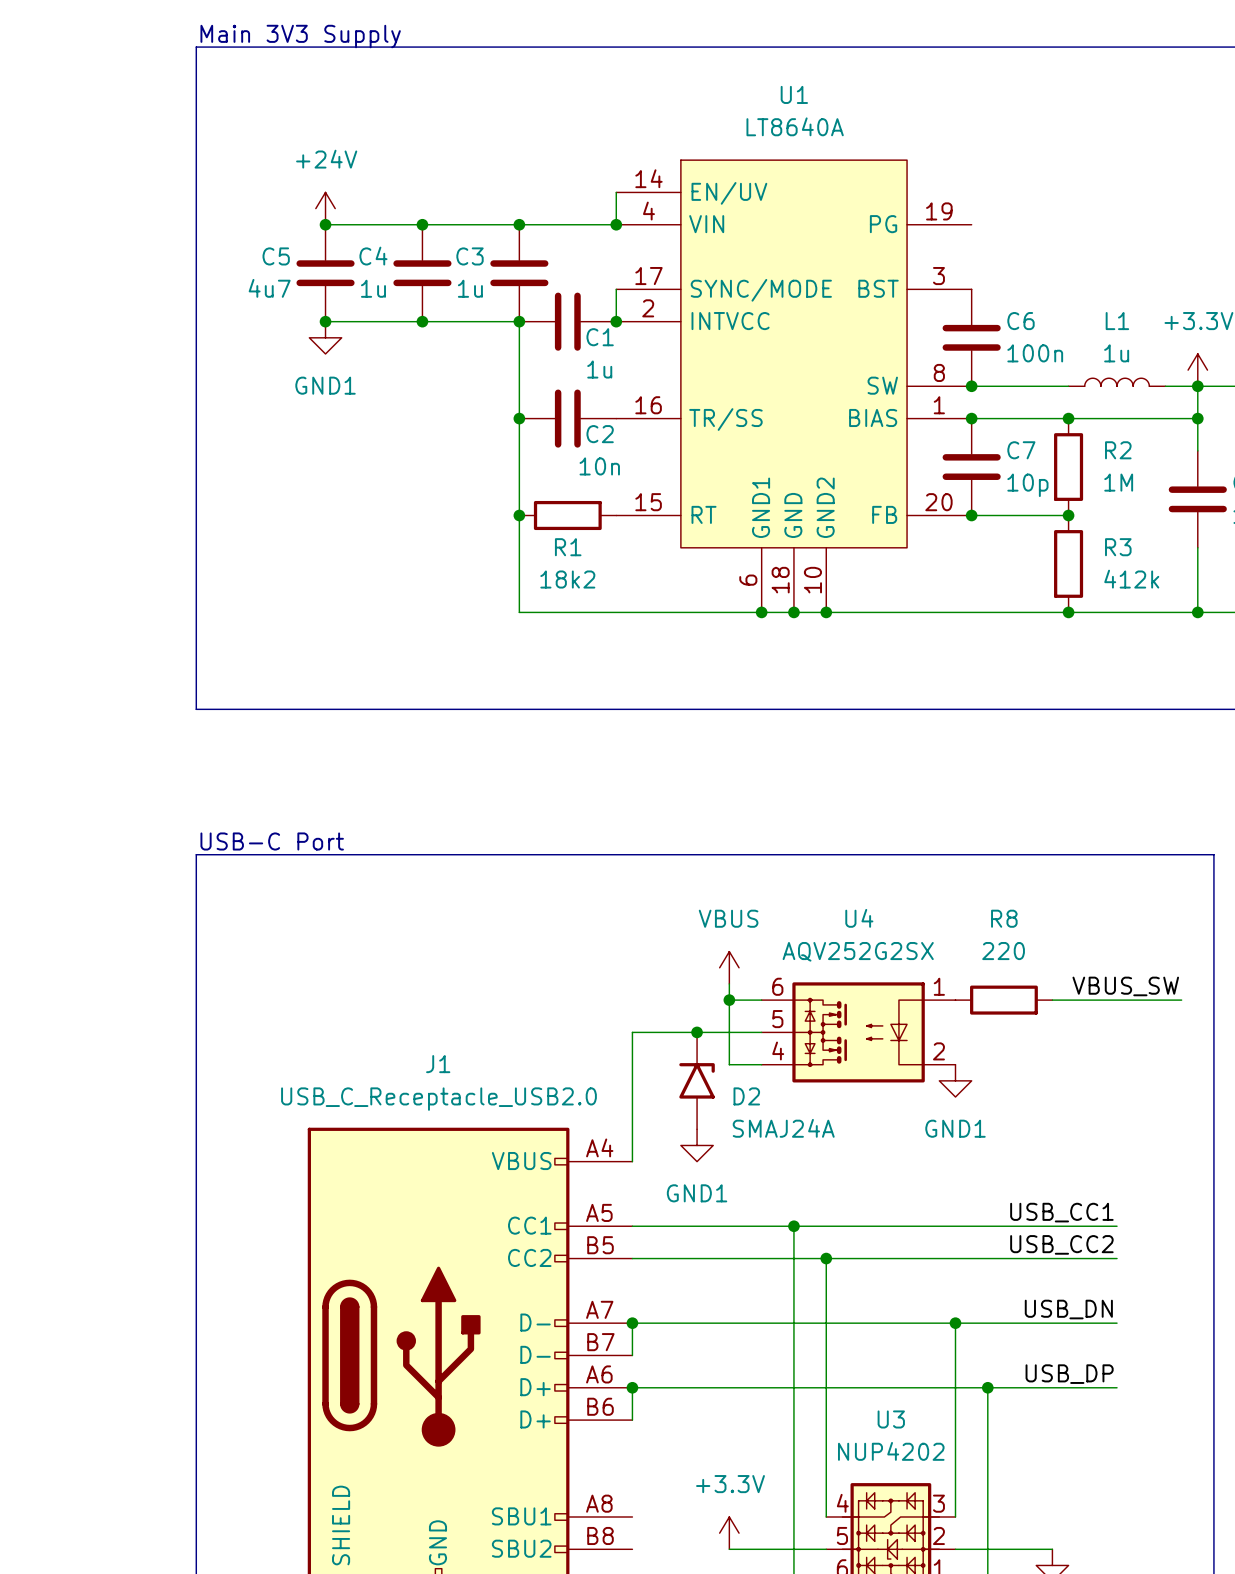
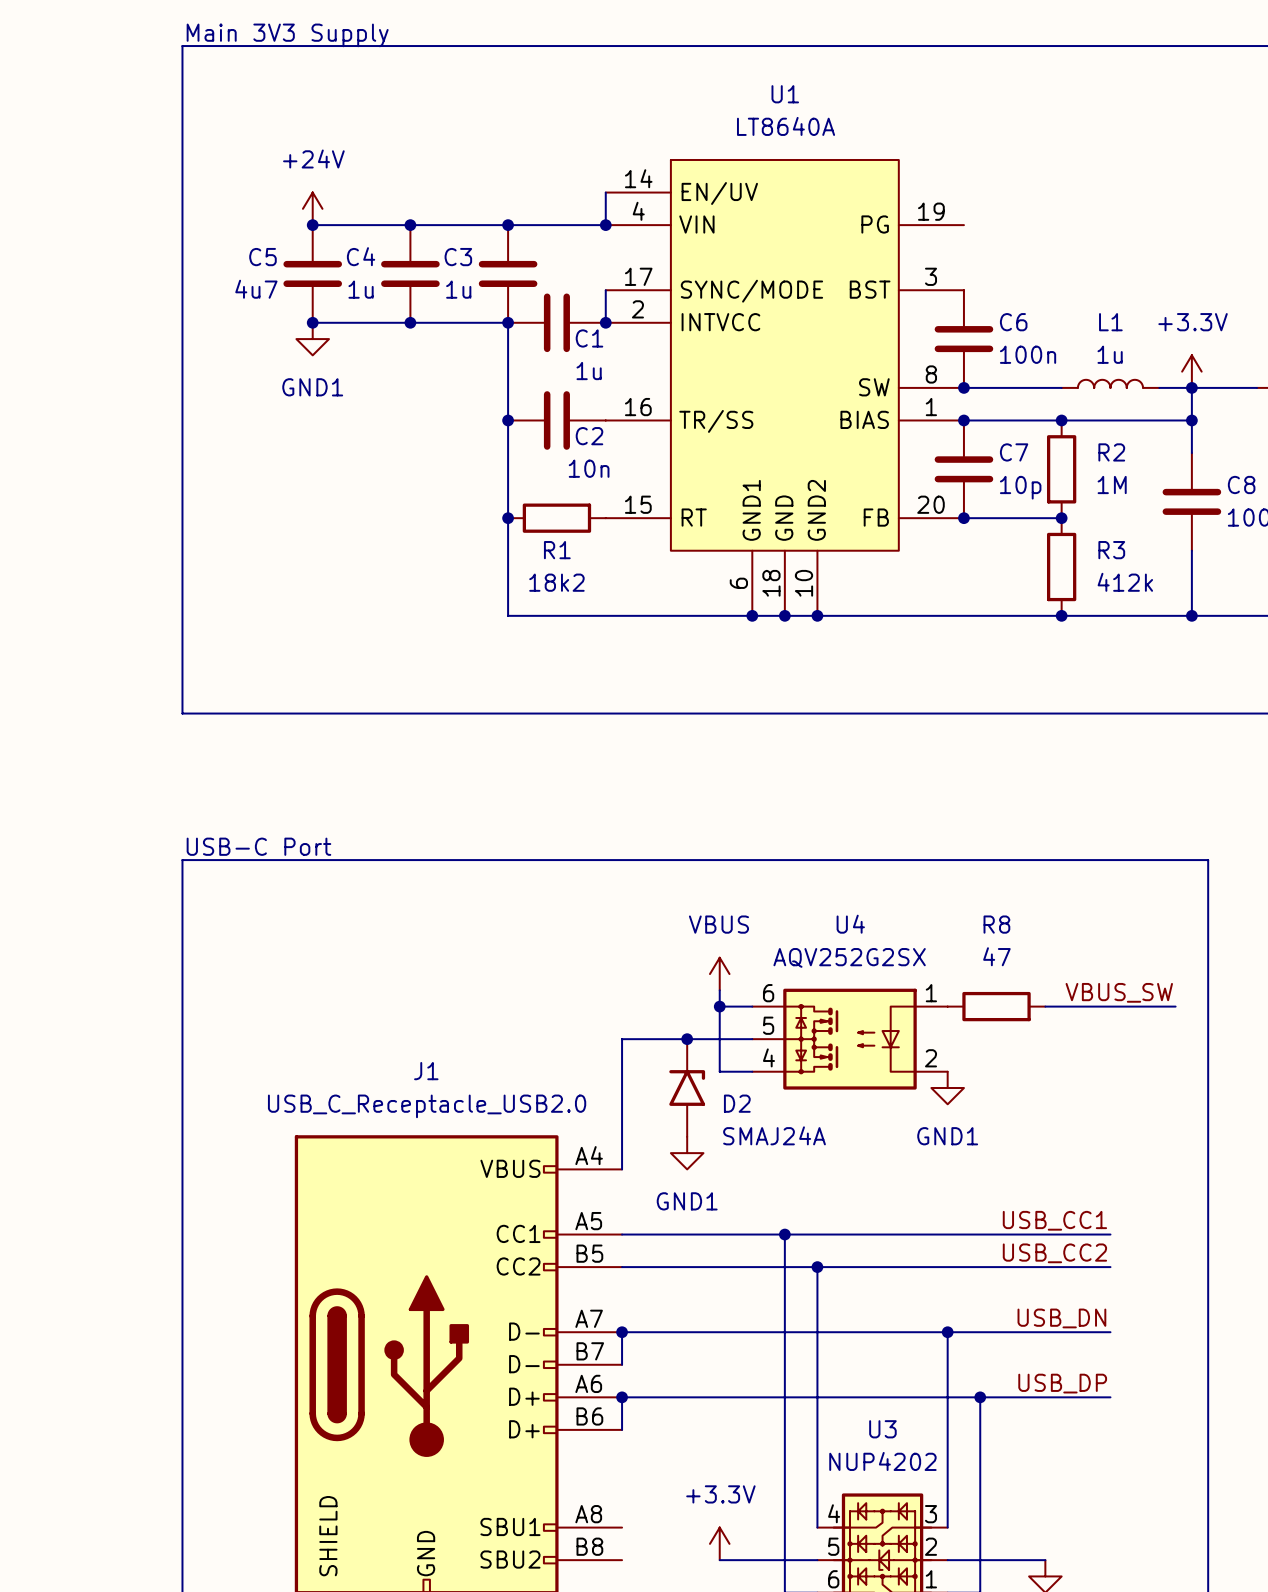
R8 value: 220 (1003, 951) -> 47 (996, 956)

